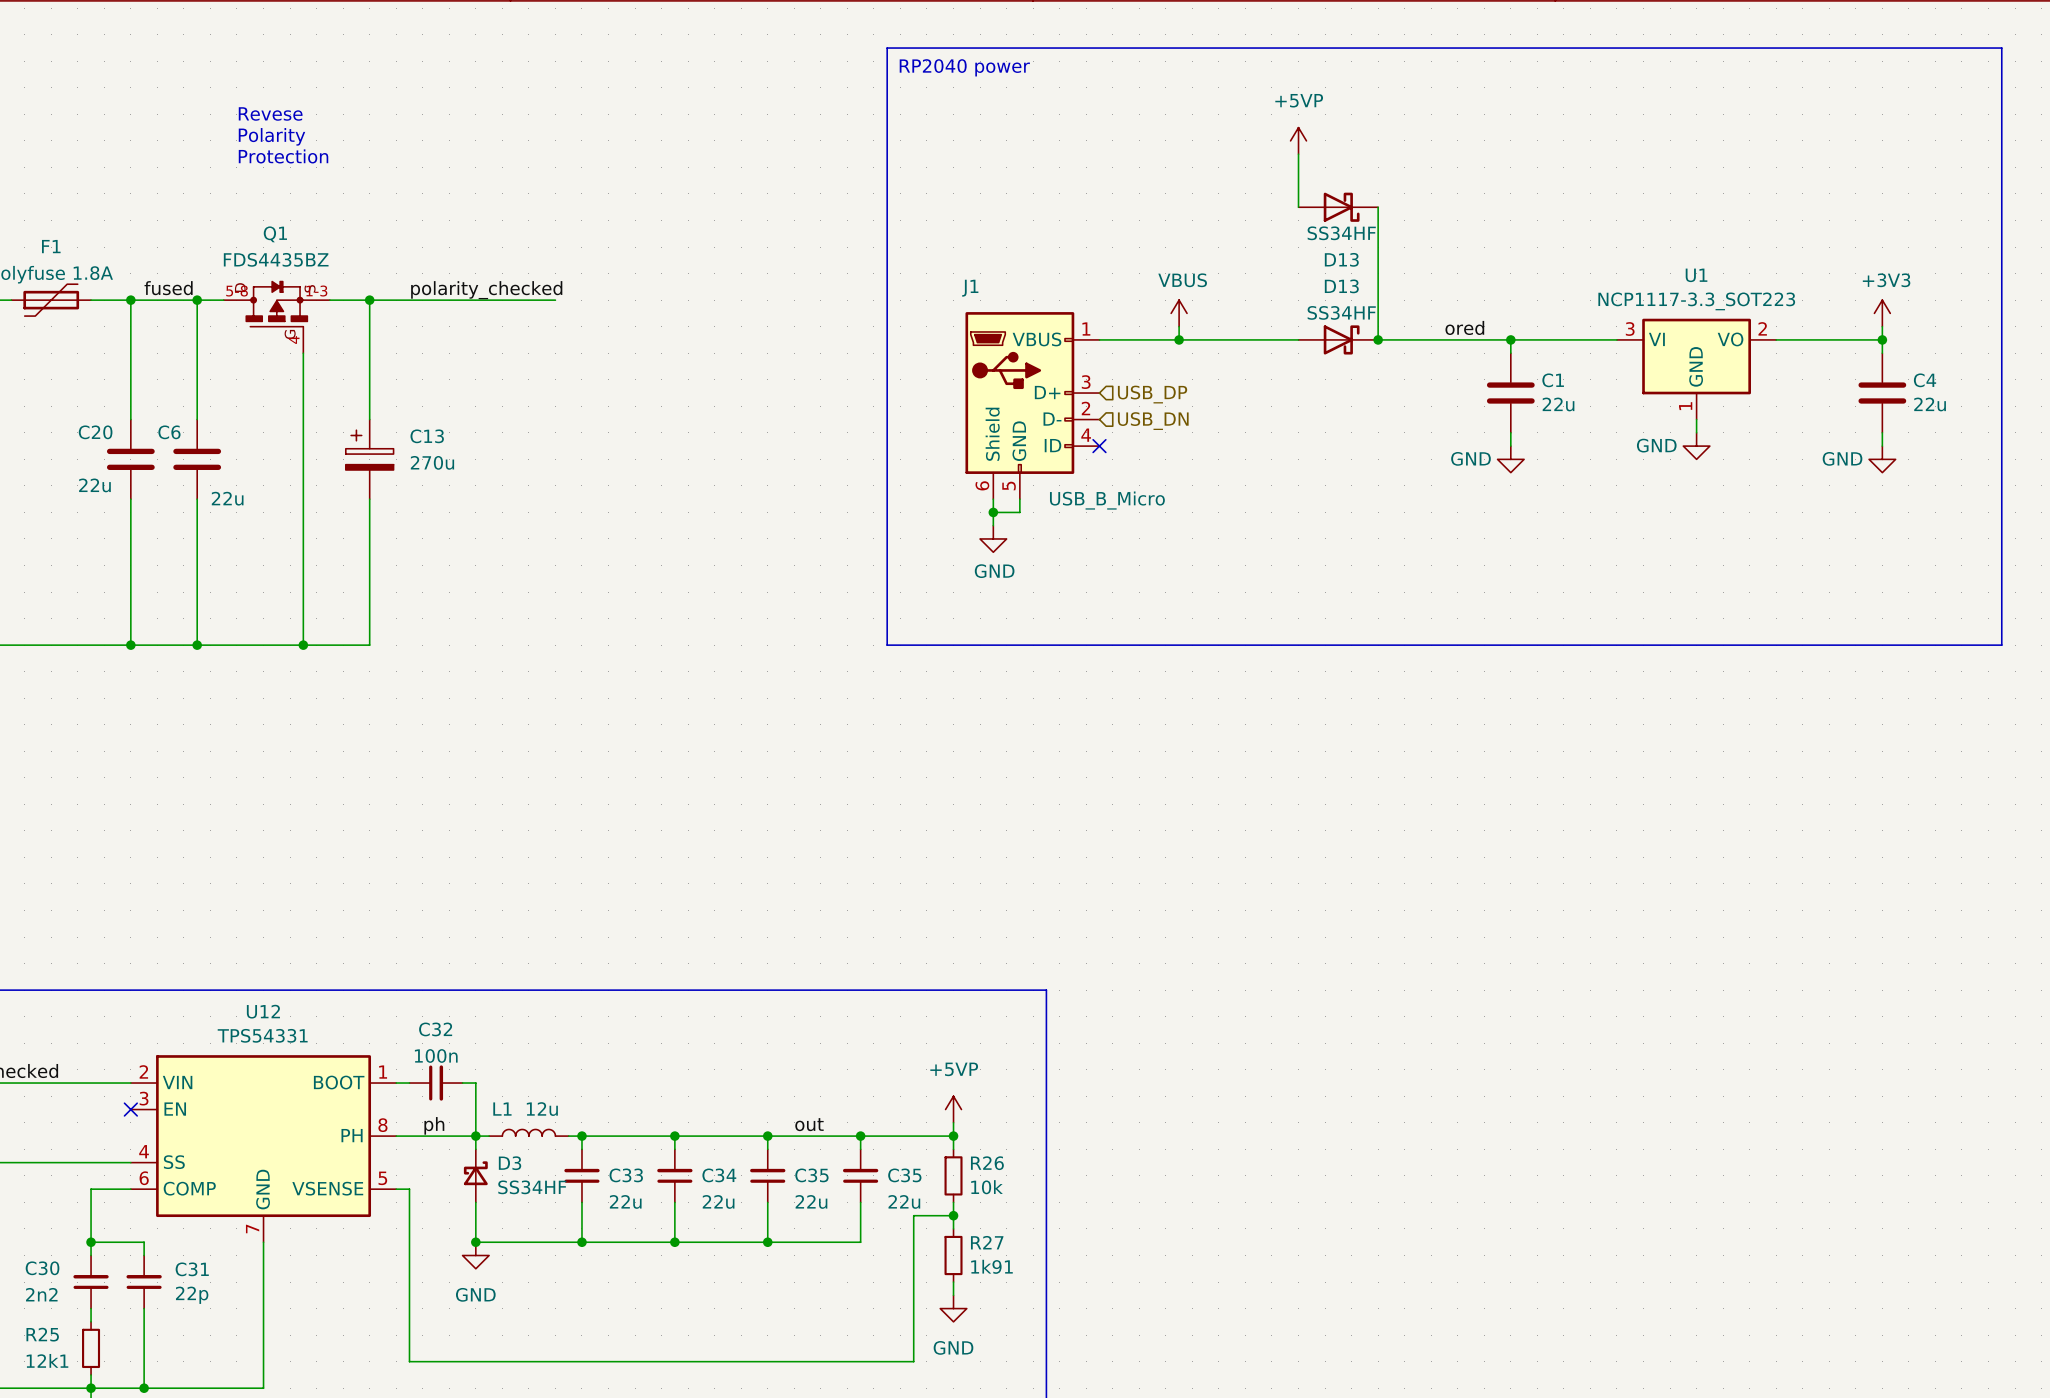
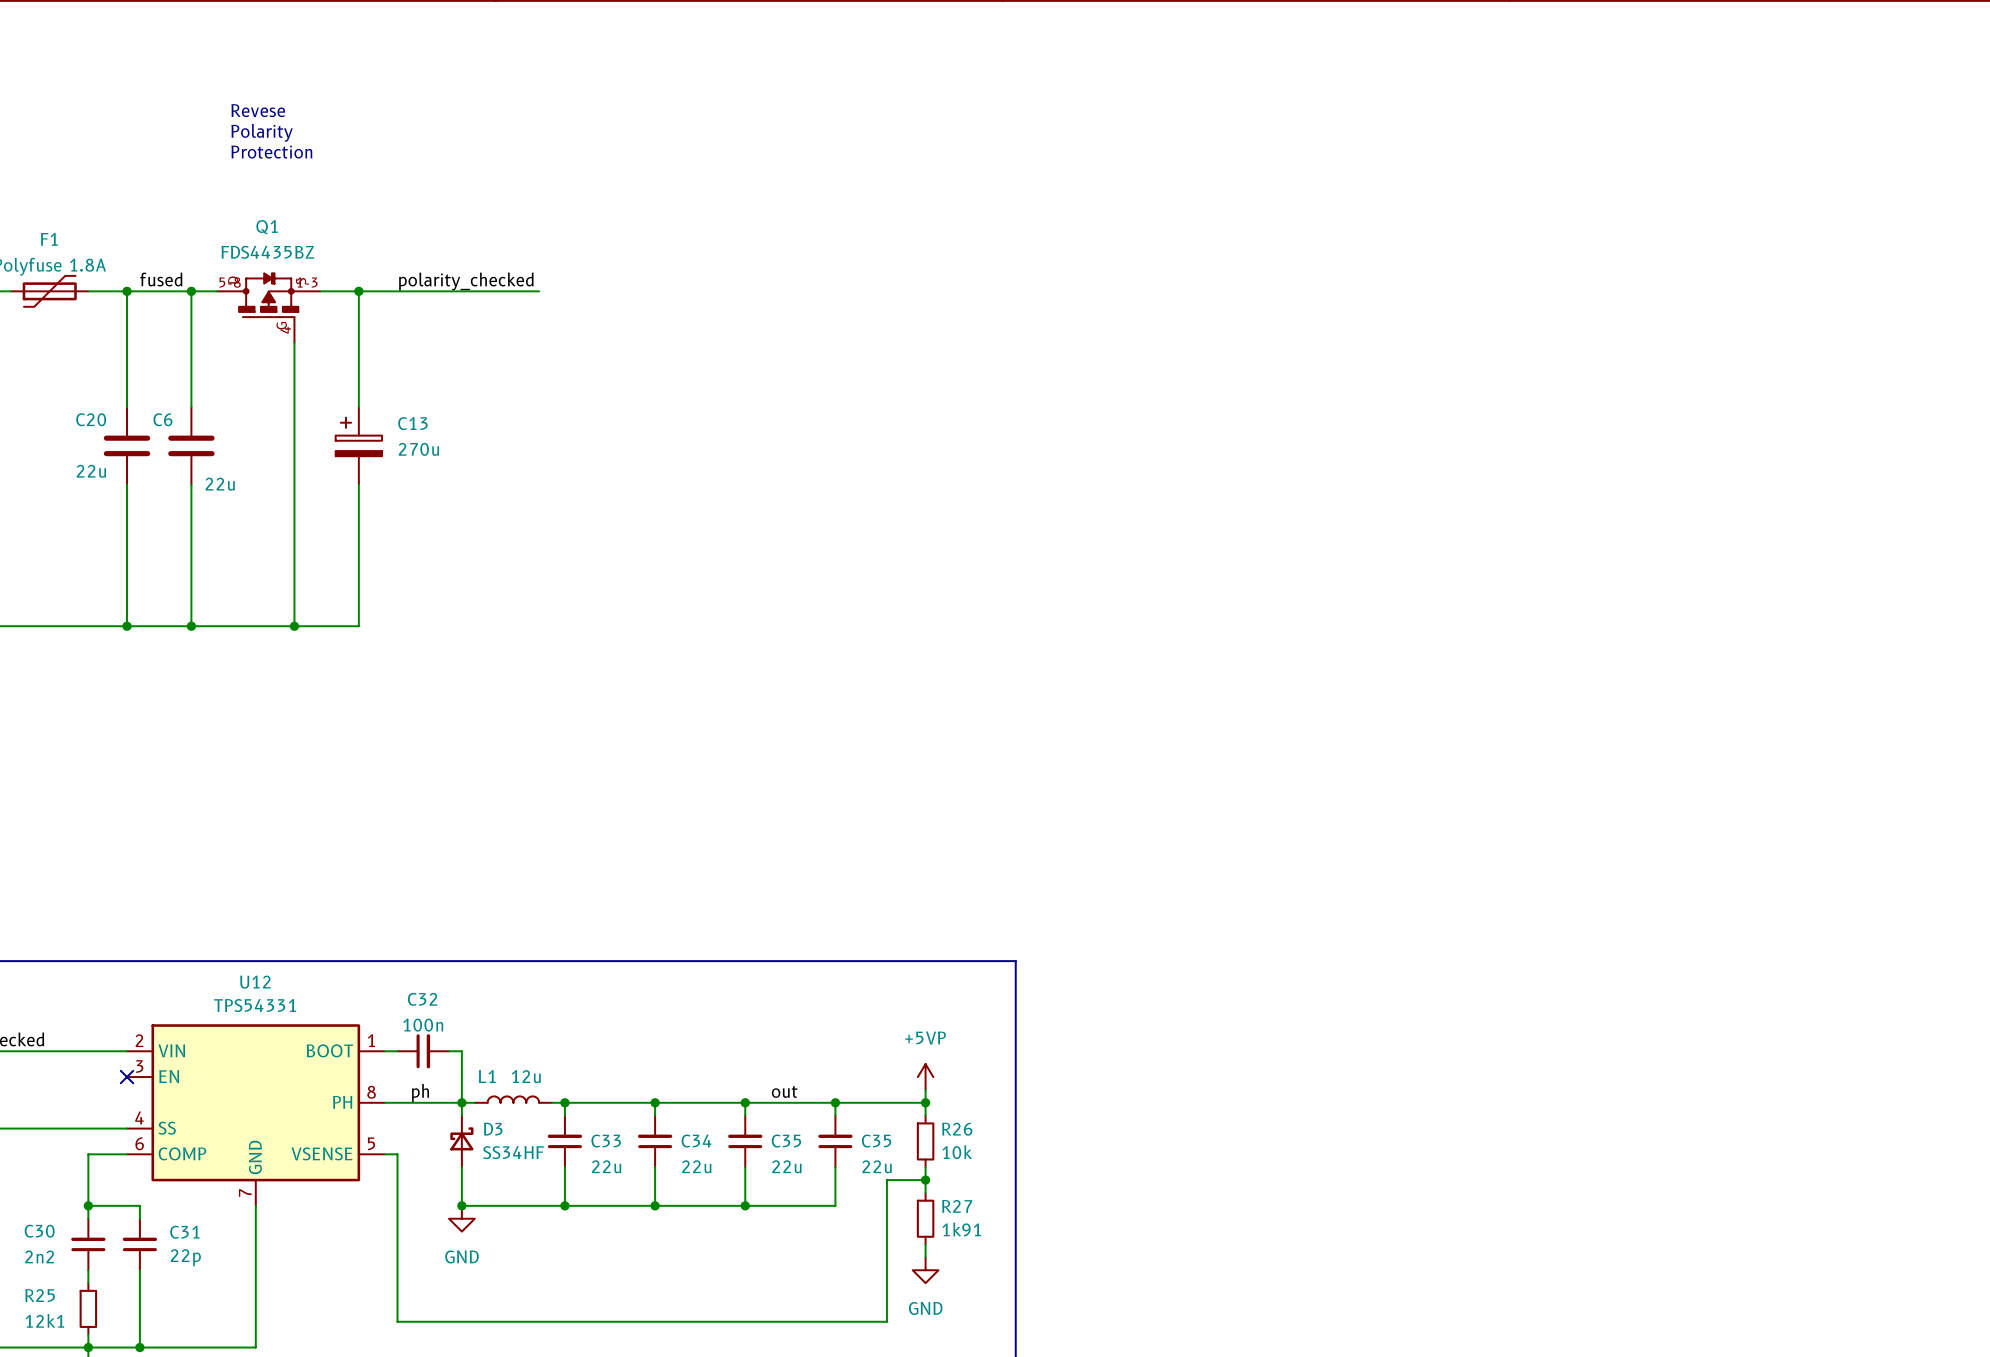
line: (887, 48) (2001, 48) (2001, 645) (887, 645) (887, 48) -> none
text: RP2040 power (964, 67) -> none
power symbol: +5VP (1298, 140) -> none
wire: (1298, 154) (1298, 207) -> none
D13: SS34HF (1338, 207) -> none
wire: (1378, 207) (1378, 339) (1616, 339) -> none
power symbol: VBUS (1179, 313) -> none
power symbol: +3V3 (1882, 313) -> none
wire: (1179, 326) (1179, 339) -> none
wire: (1882, 326) (1882, 353) -> none
label: ored (1464, 327) -> none
wire: (1099, 339) (1298, 339) -> none
junction: (1179, 339) -> none
D13: SS34HF (1338, 339) -> none
junction: (1378, 339) -> none
wire: (1510, 339) (1510, 353) -> none
junction: (1510, 339) -> none
wire: (1776, 339) (1882, 339) -> none
junction: (1882, 339) -> none
U1: NCP1117-3.3_SOT223 (1696, 369) -> none
C1: 22u (1510, 393) -> none
C4: 22u (1882, 393) -> none
hierarchical label: USB_DP (1152, 394) -> none
J1: USB_B_Micro (1032, 405) -> none
wire: (1696, 419) (1696, 432) -> none
hierarchical label: USB_DN (1153, 421) -> none
wire: (1510, 432) (1510, 446) -> none
wire: (1882, 432) (1882, 446) -> none
no-connect mark: (1099, 446) -> none
power symbol: GND (1696, 446) -> none
power symbol: GND (1510, 459) -> none
power symbol: GND (1882, 459) -> none
wire: (993, 499) (993, 525) -> none
wire: (1019, 499) (1019, 512) (993, 512) -> none
junction: (993, 512) -> none
power symbol: GND (993, 538) -> none

